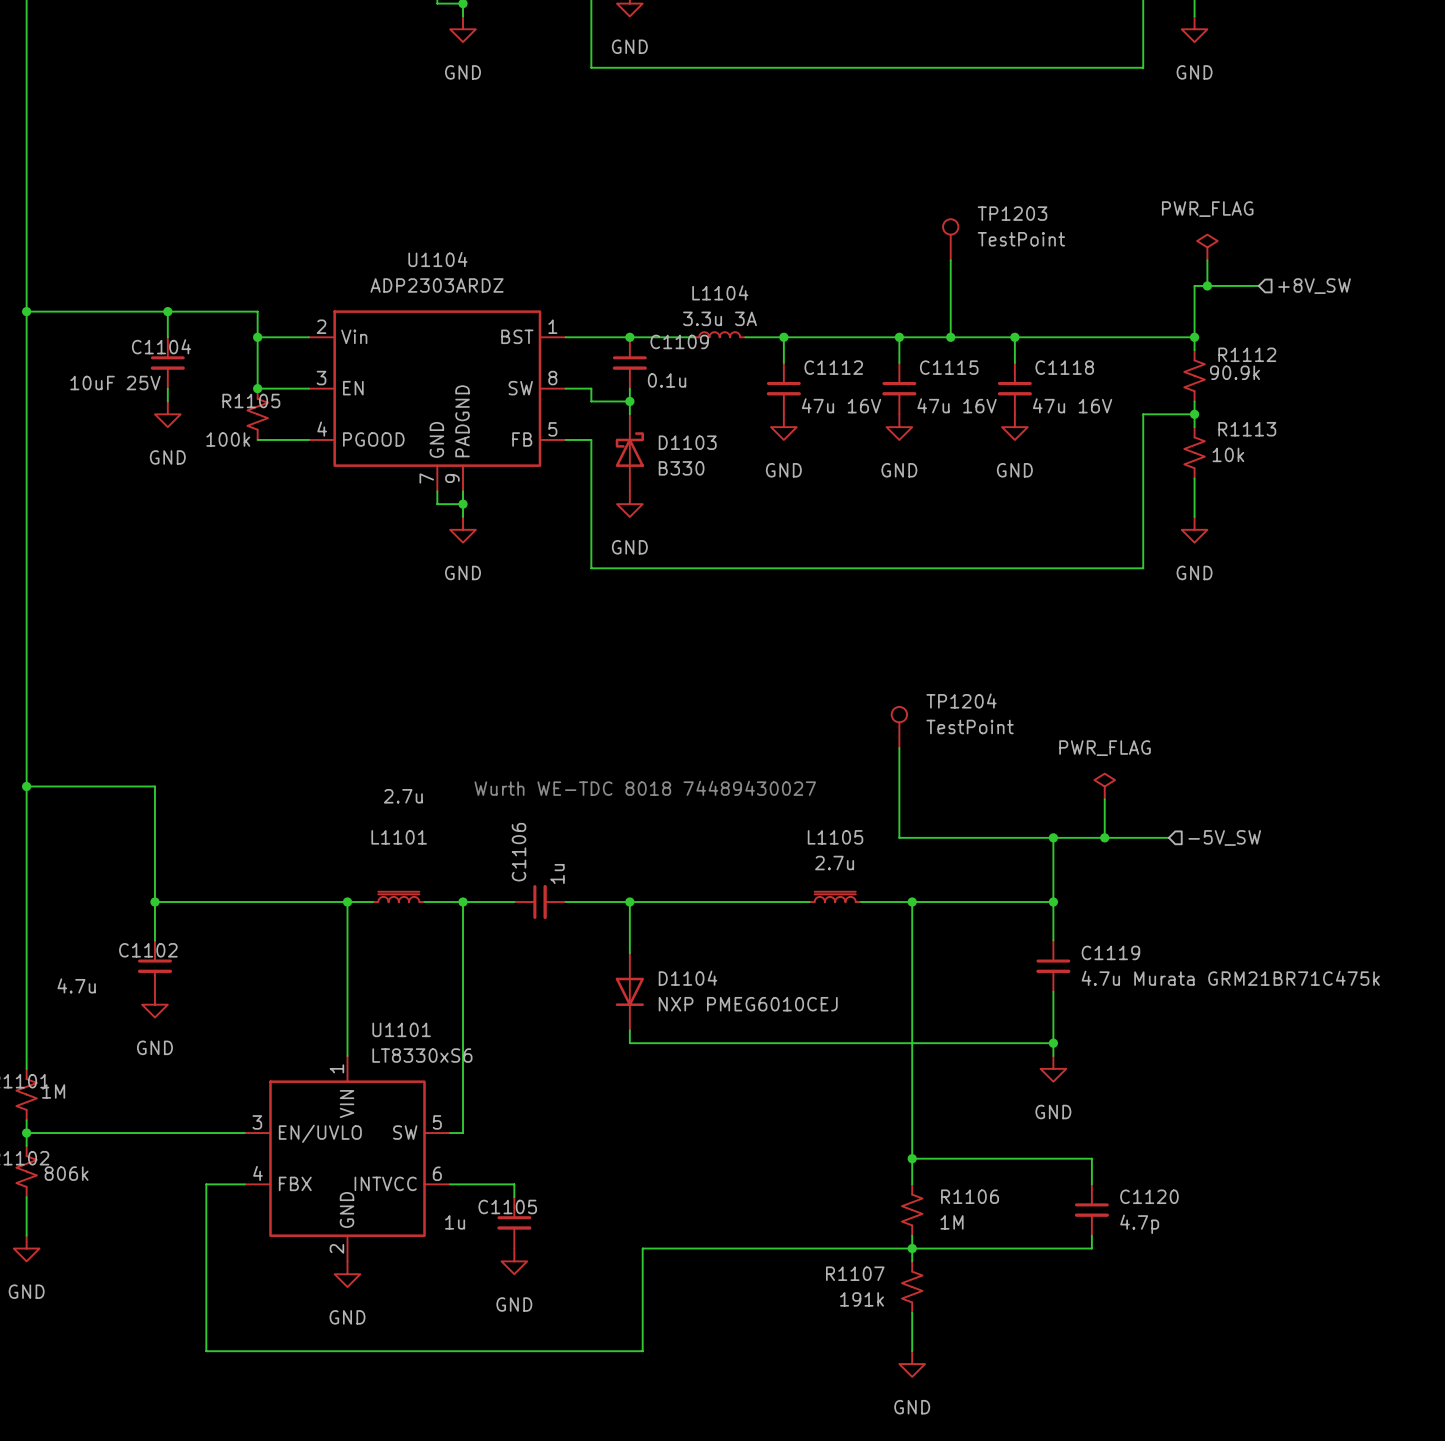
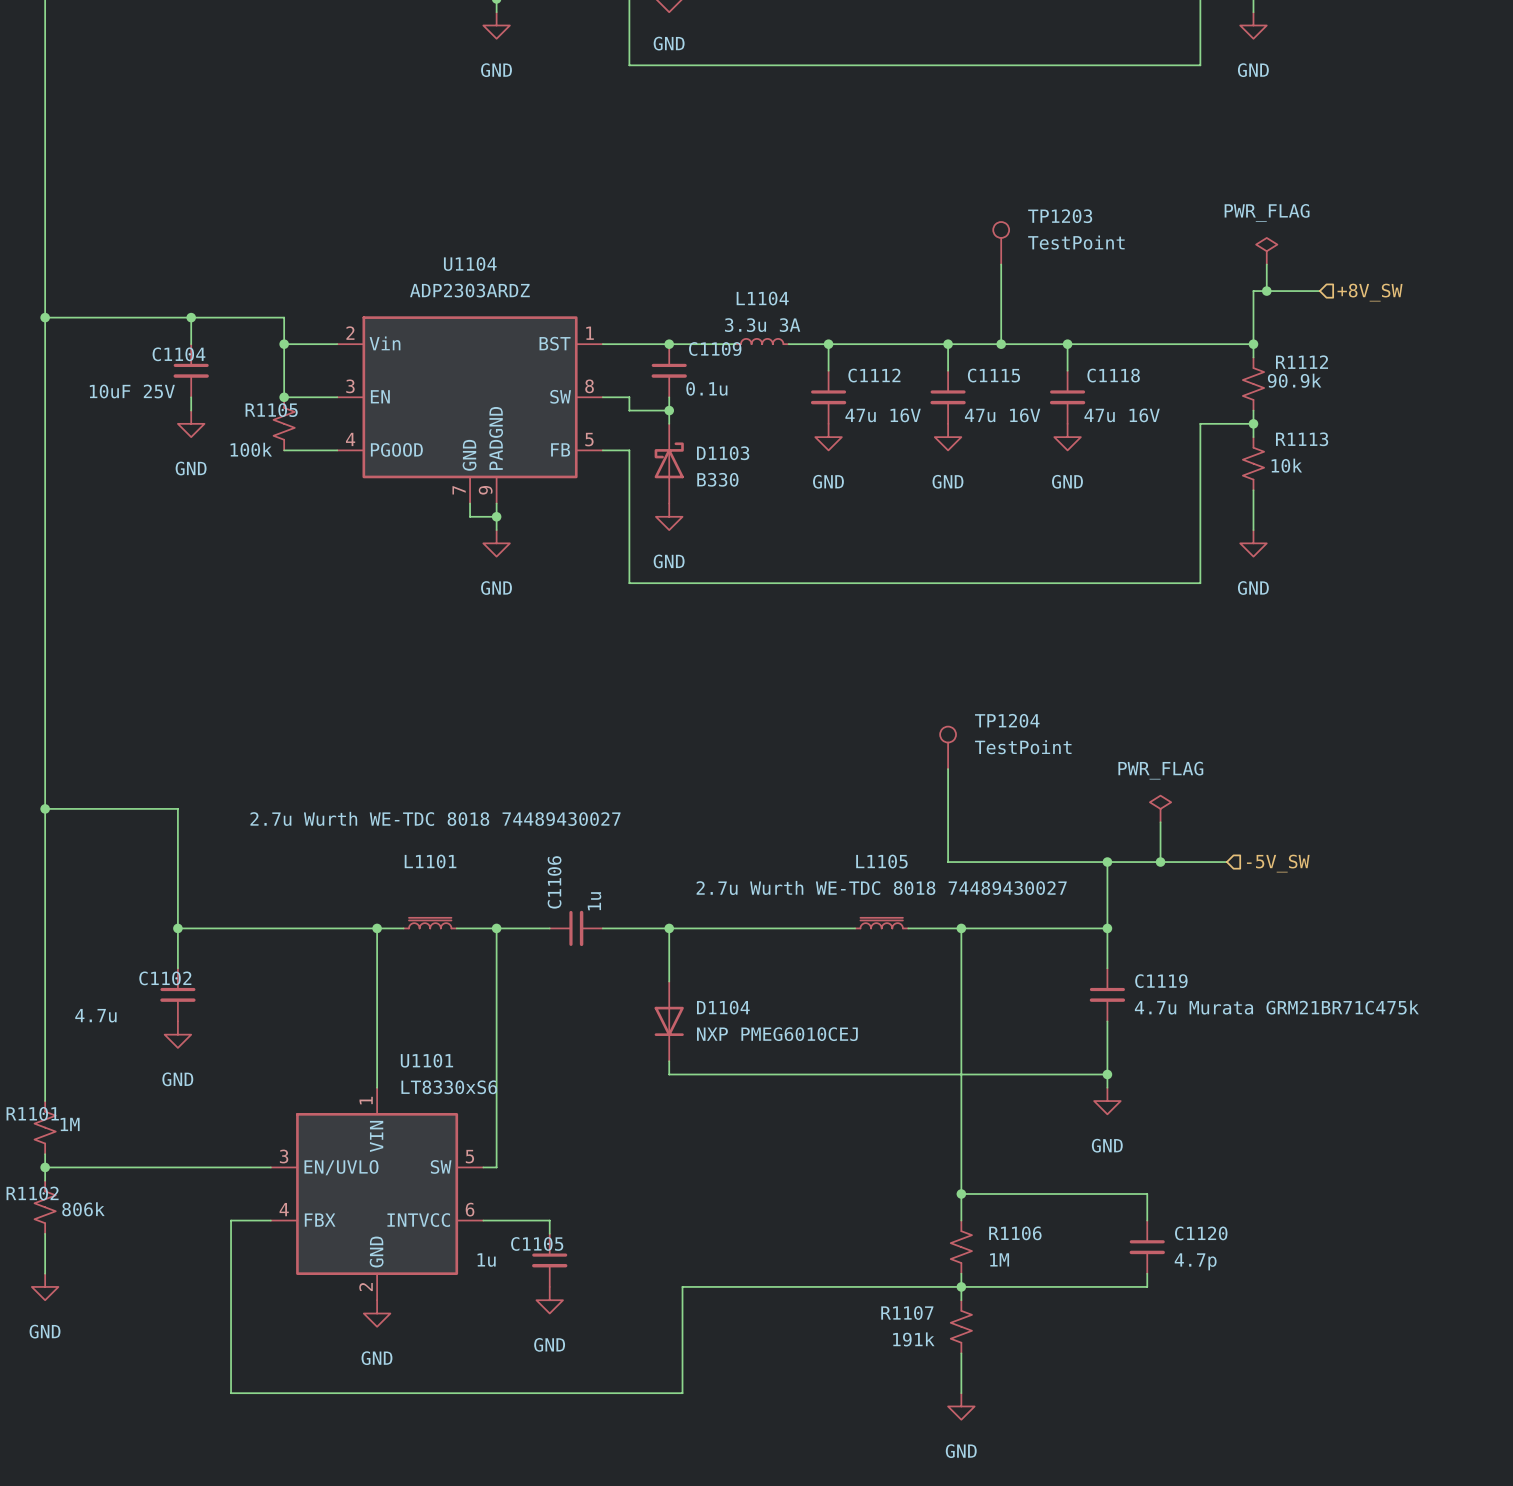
text: Wurth WE-TDC 8018 74489430027 (645, 788) -> none
L1101 value: 2.7u (403, 796) -> 2.7u Wurth WE-TDC 8018 74489430027 (435, 818)
L1105 value: 2.7u (834, 863) -> 2.7u Wurth WE-TDC 8018 74489430027 (881, 887)

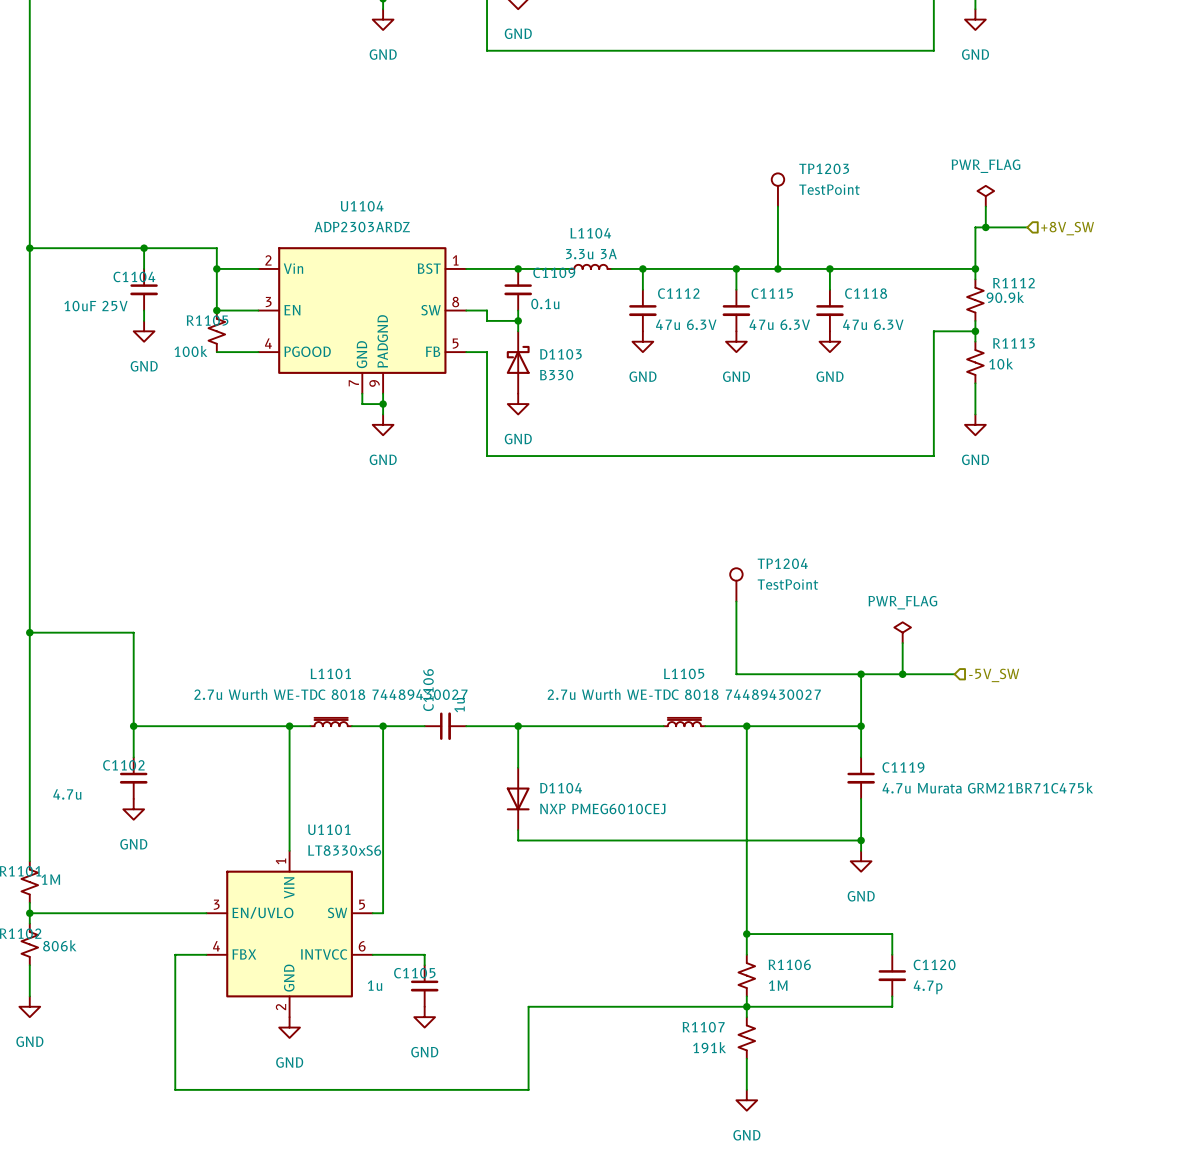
C1112 value: 47u 16V (883, 415) -> 47u 6.3V (686, 324)
C1115 value: 47u 16V (1002, 415) -> 47u 6.3V (779, 324)
C1118 value: 47u 16V (1122, 415) -> 47u 6.3V (873, 324)
L1101 value position: 2.7u Wurth WE-TDC 8018 74489430027 (435, 818) -> 2.7u Wurth WE-TDC 8018 74489430027 (330, 694)

